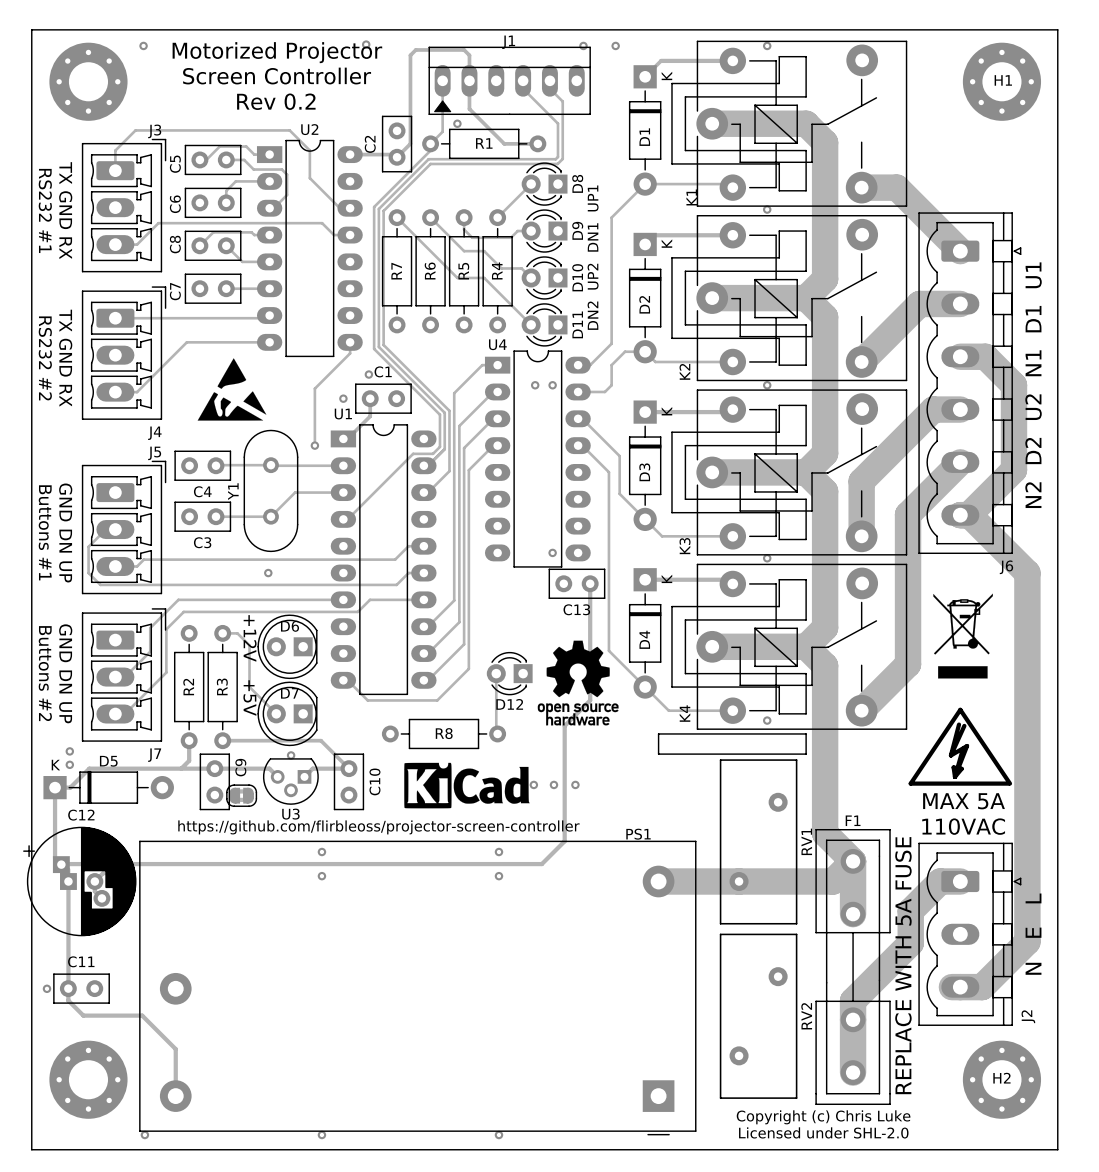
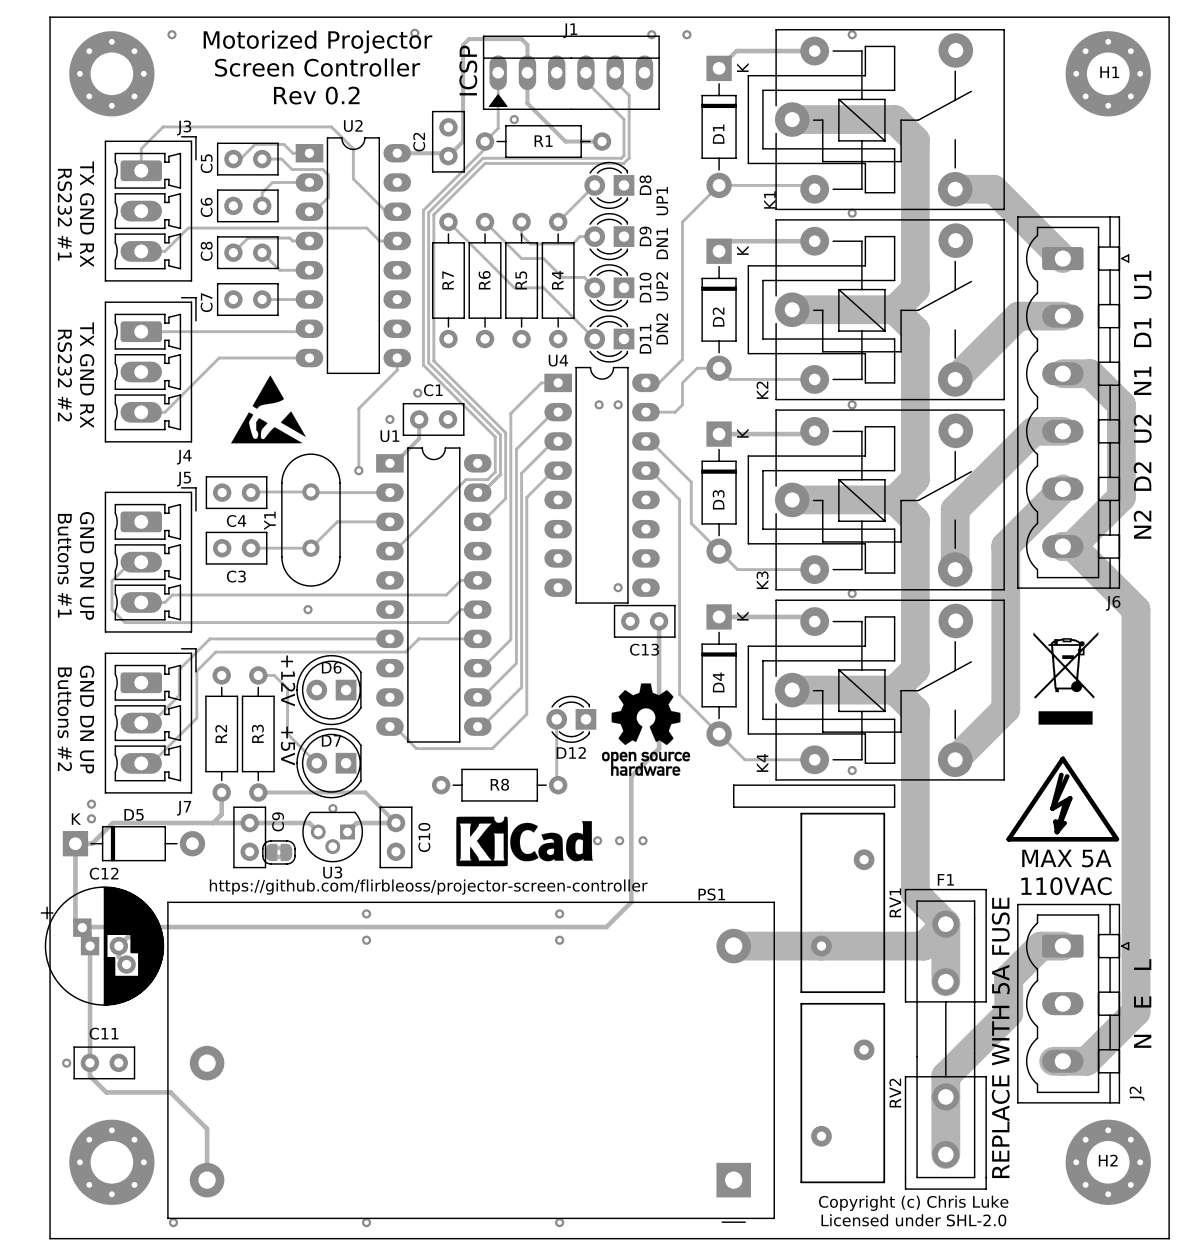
text: none -> ICSP (468, 70)

